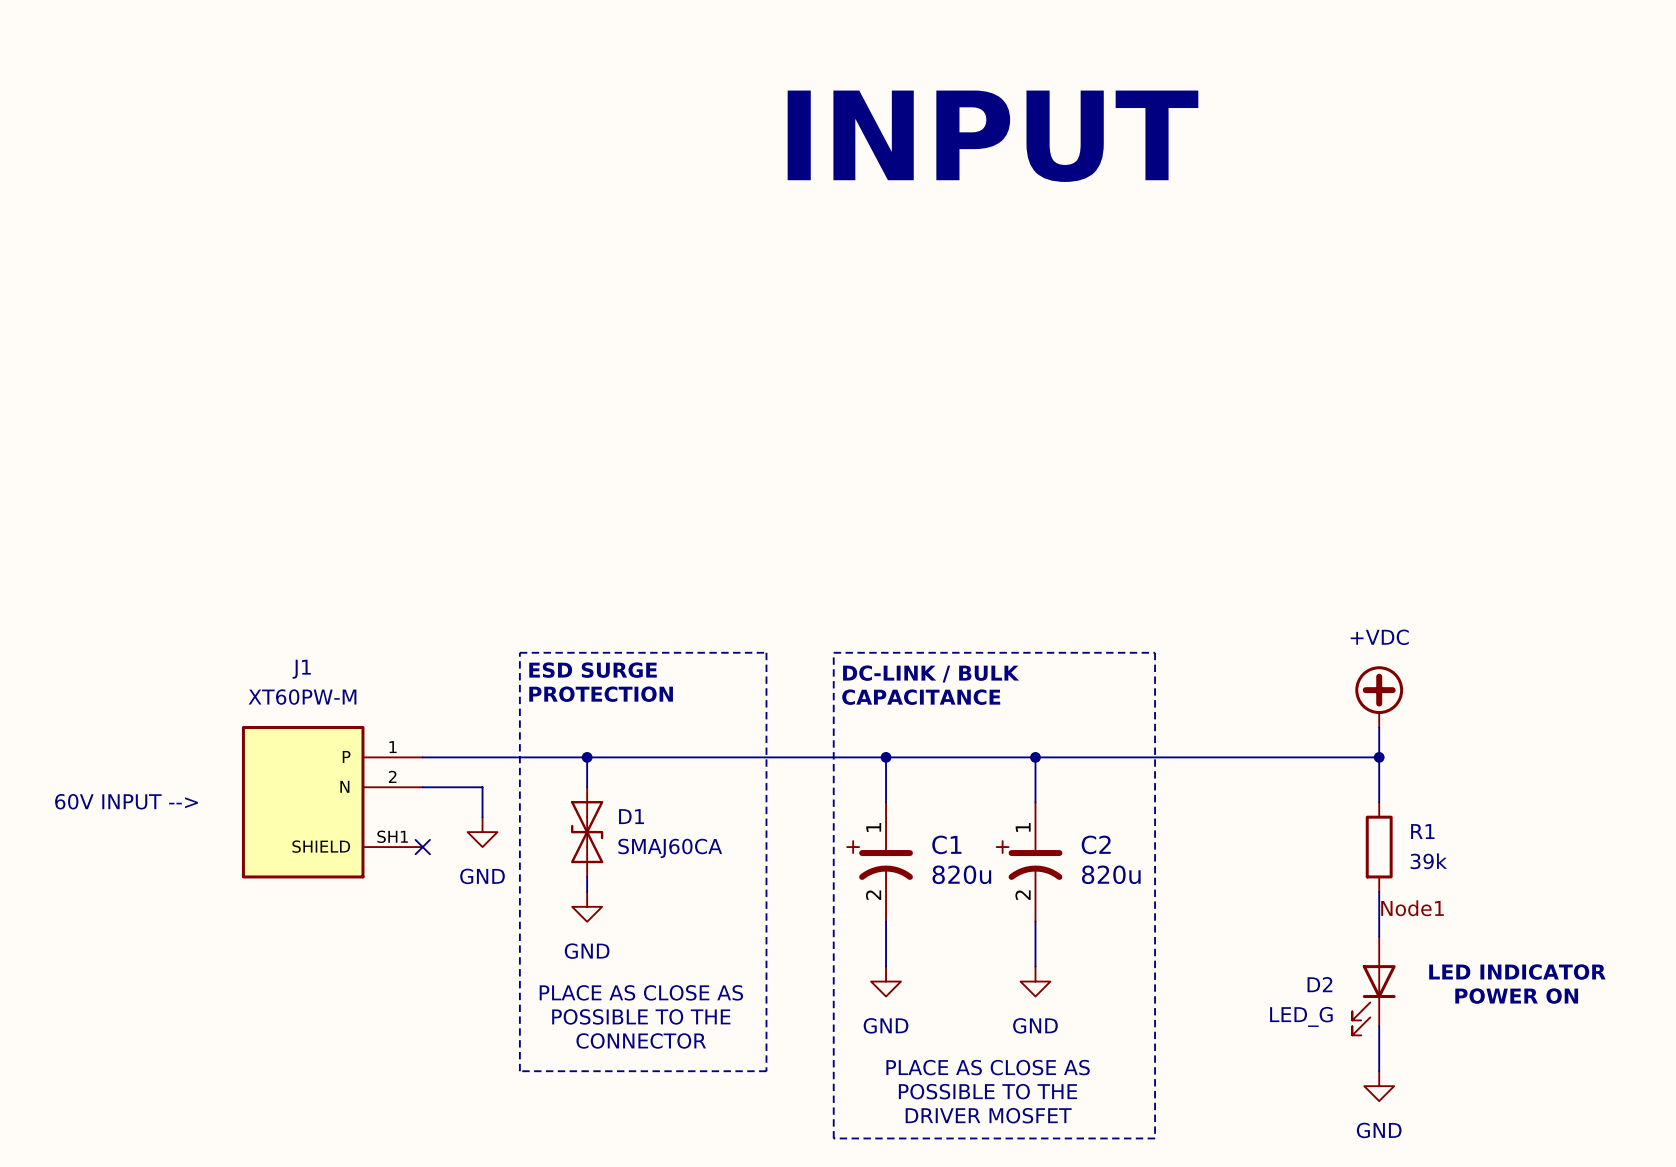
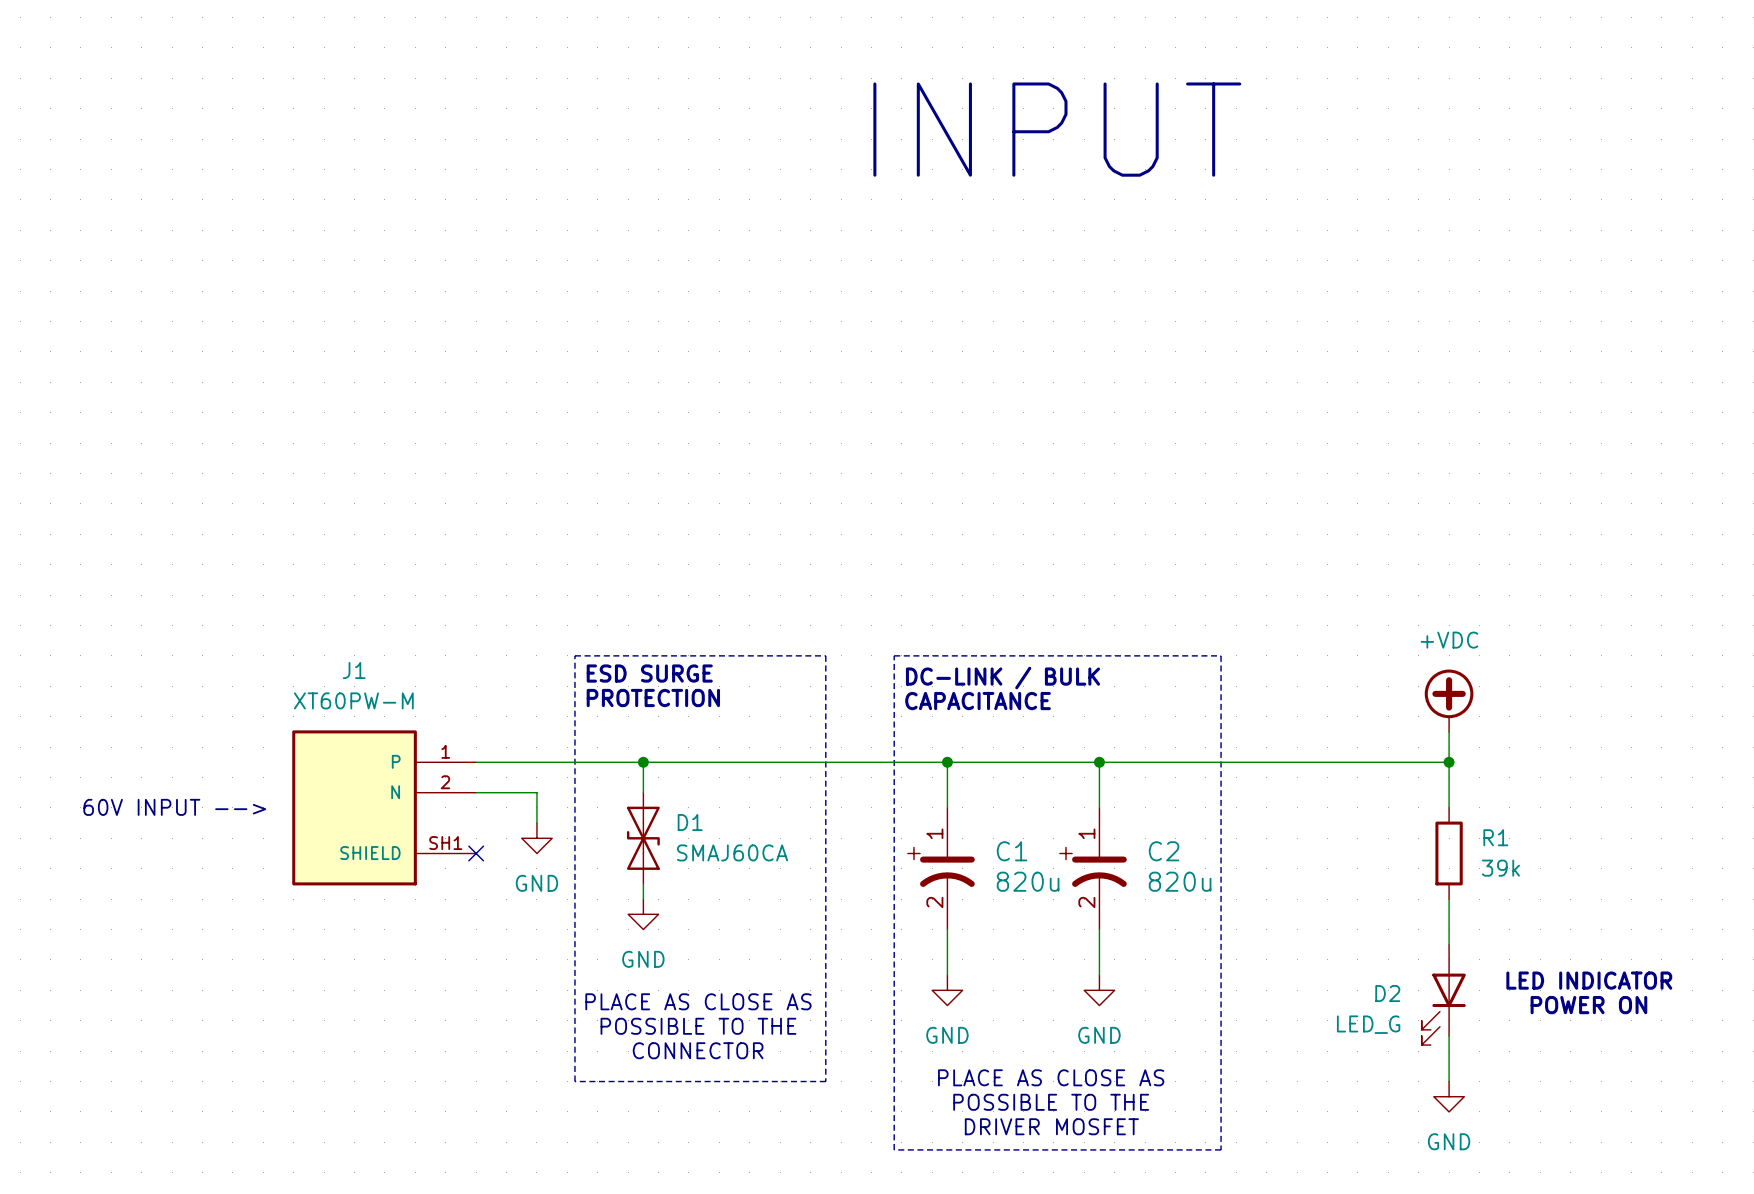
label: Node1 (1412, 908) -> none

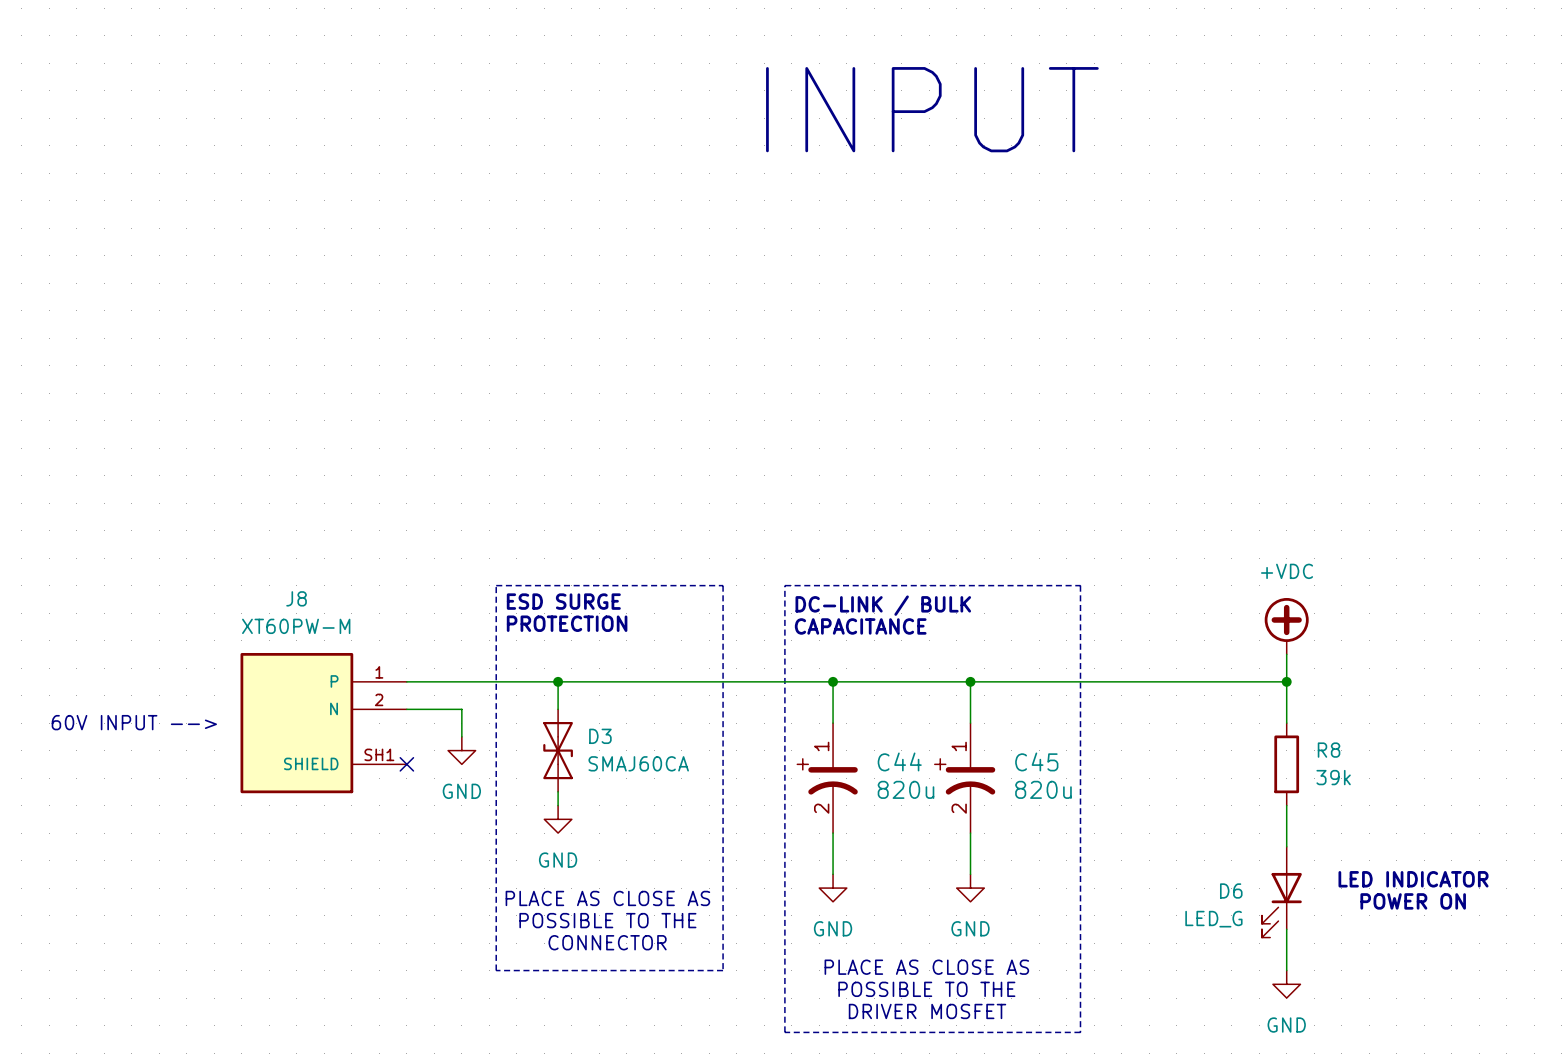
J1 name: J1 (354, 670) -> J8 (296, 598)
D1 name: D1 (690, 822) -> D3 (600, 736)
R1 name: R1 (1495, 837) -> R8 (1329, 750)
C1 name: C1 (1012, 851) -> C44 (899, 761)
C2 name: C2 (1164, 851) -> C45 (1036, 761)
D2 name: D2 (1387, 993) -> D6 (1231, 890)

